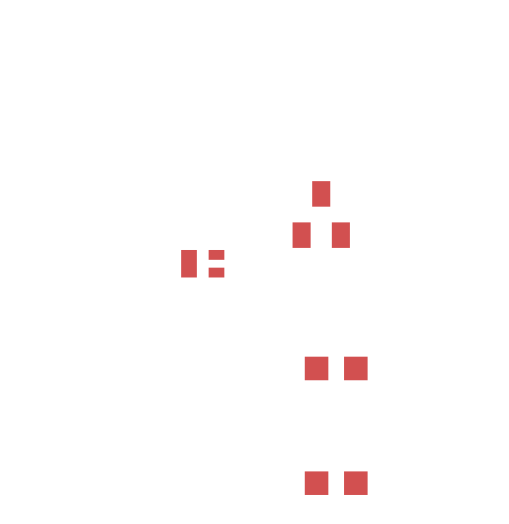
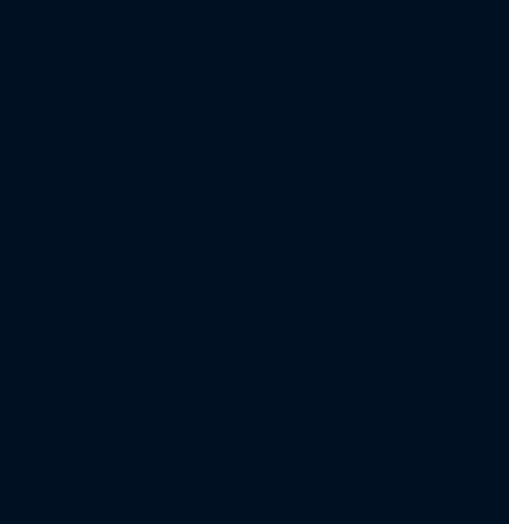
part: (321, 214) -> none
part: (202, 263) -> none
part: (336, 368) -> none
part: (336, 483) -> none

